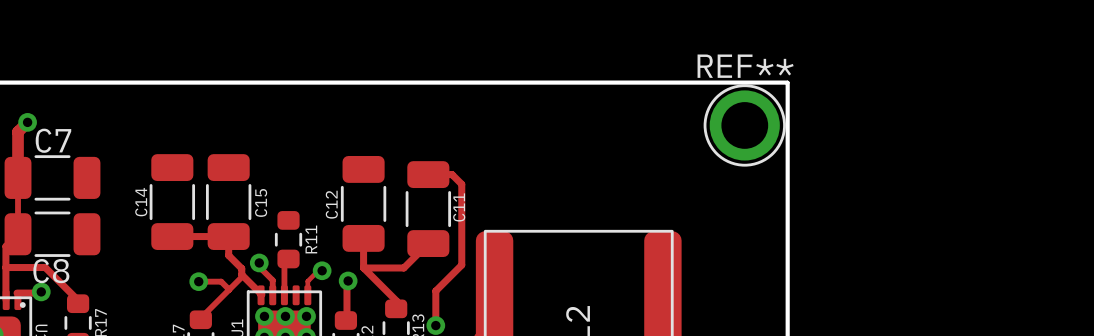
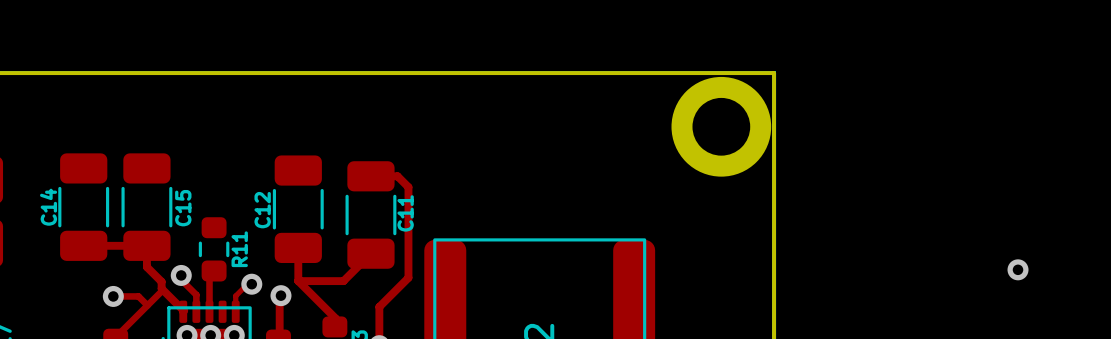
REF**: (744, 125) -> none
part: none -> (721, 126)
via: none -> (1018, 269)

